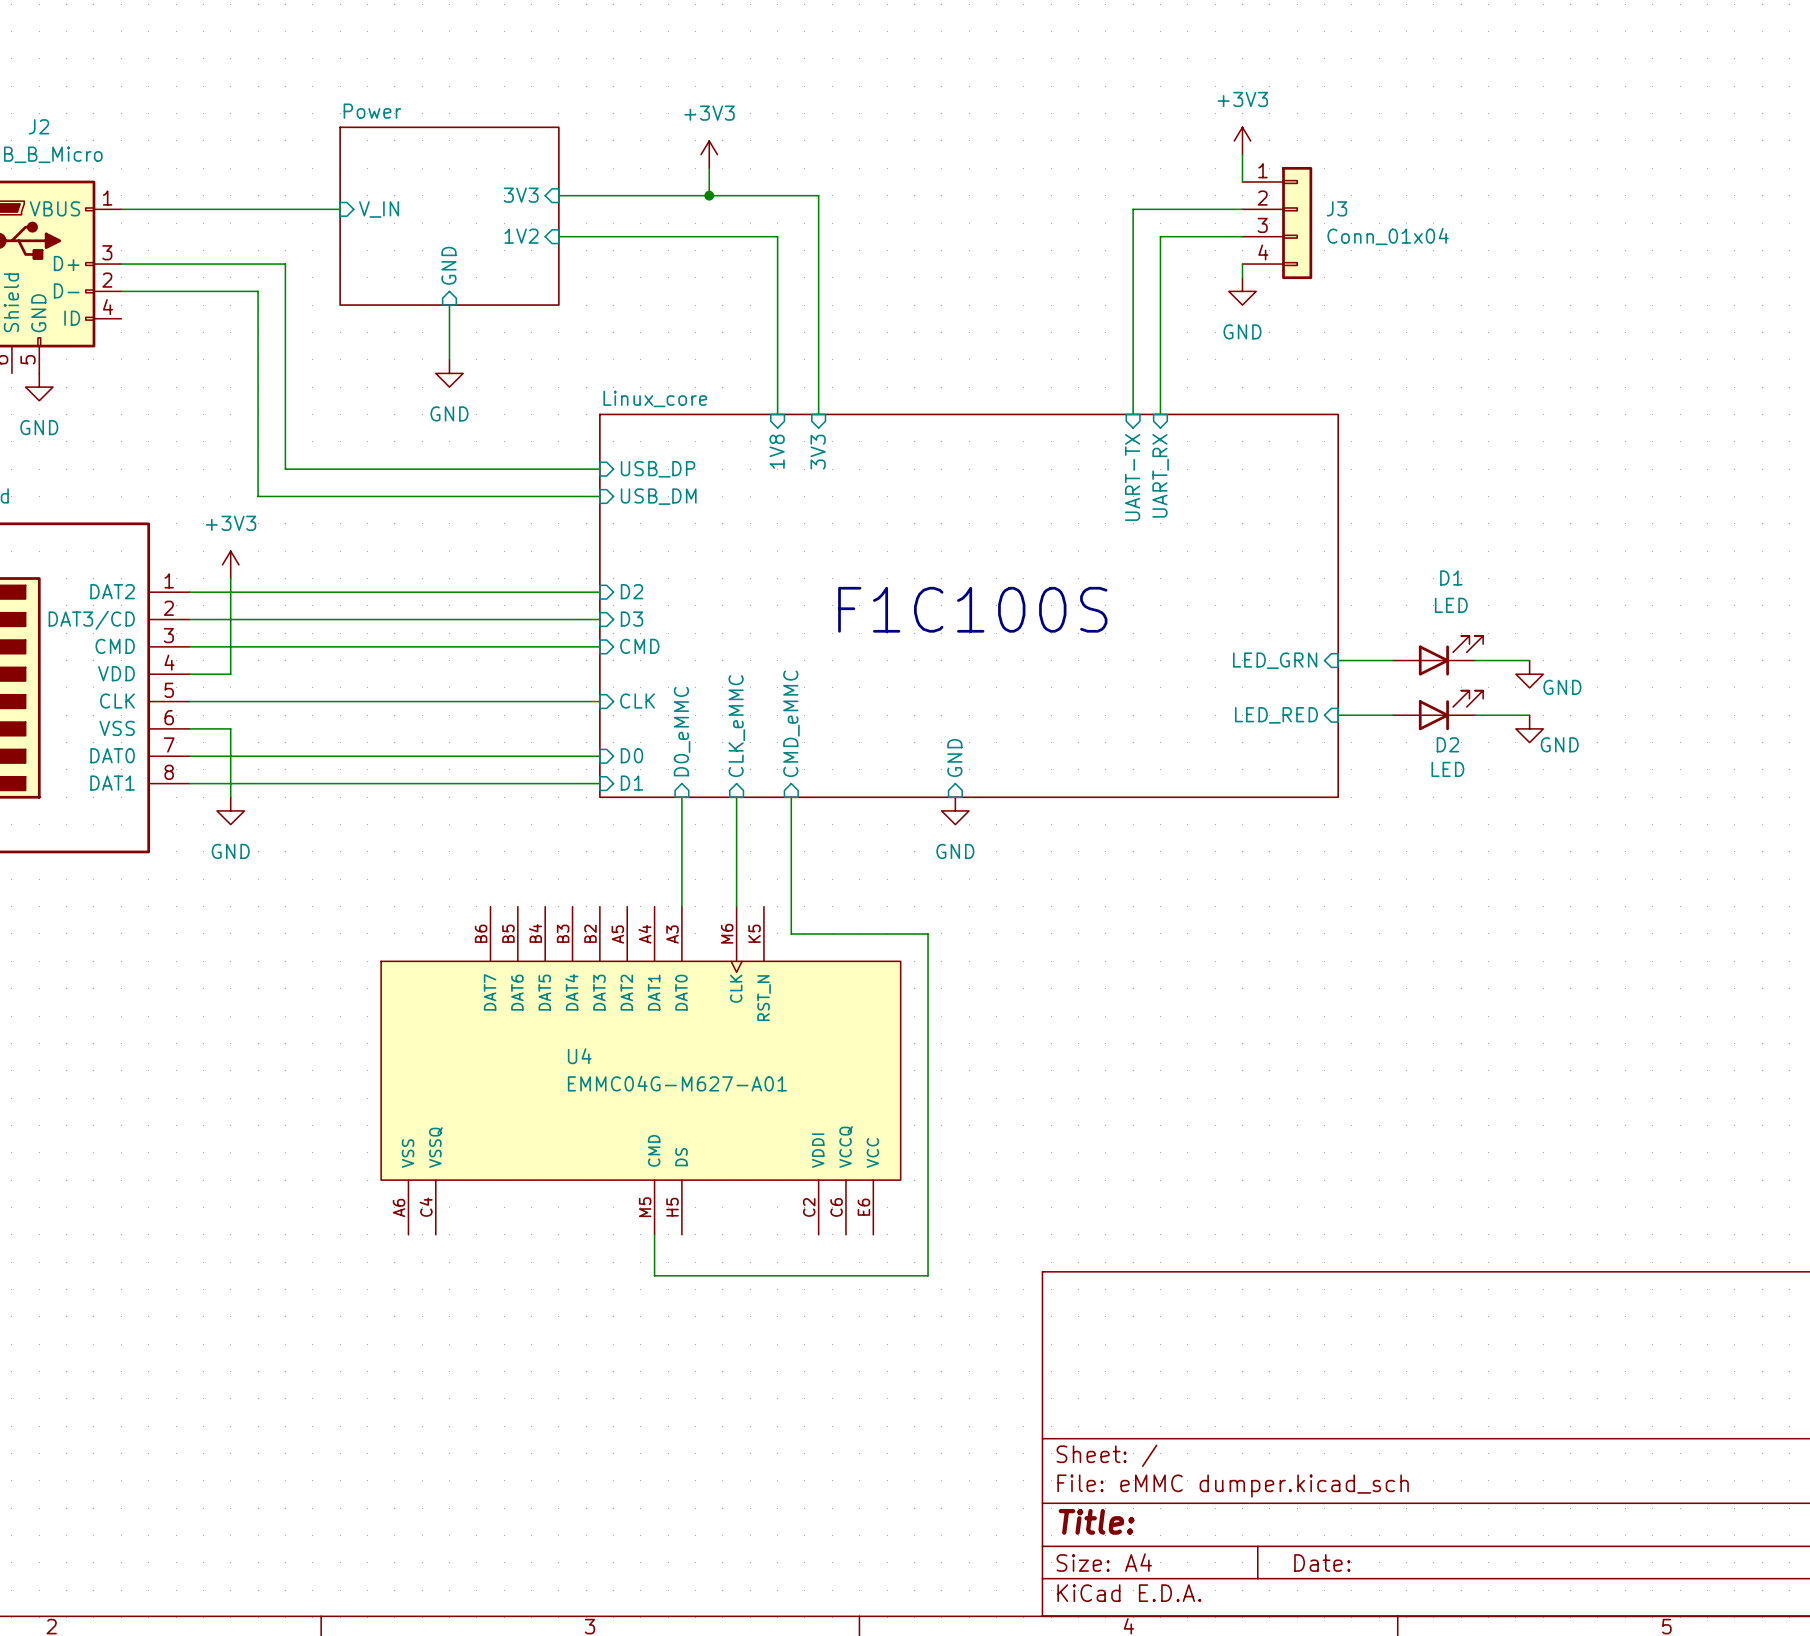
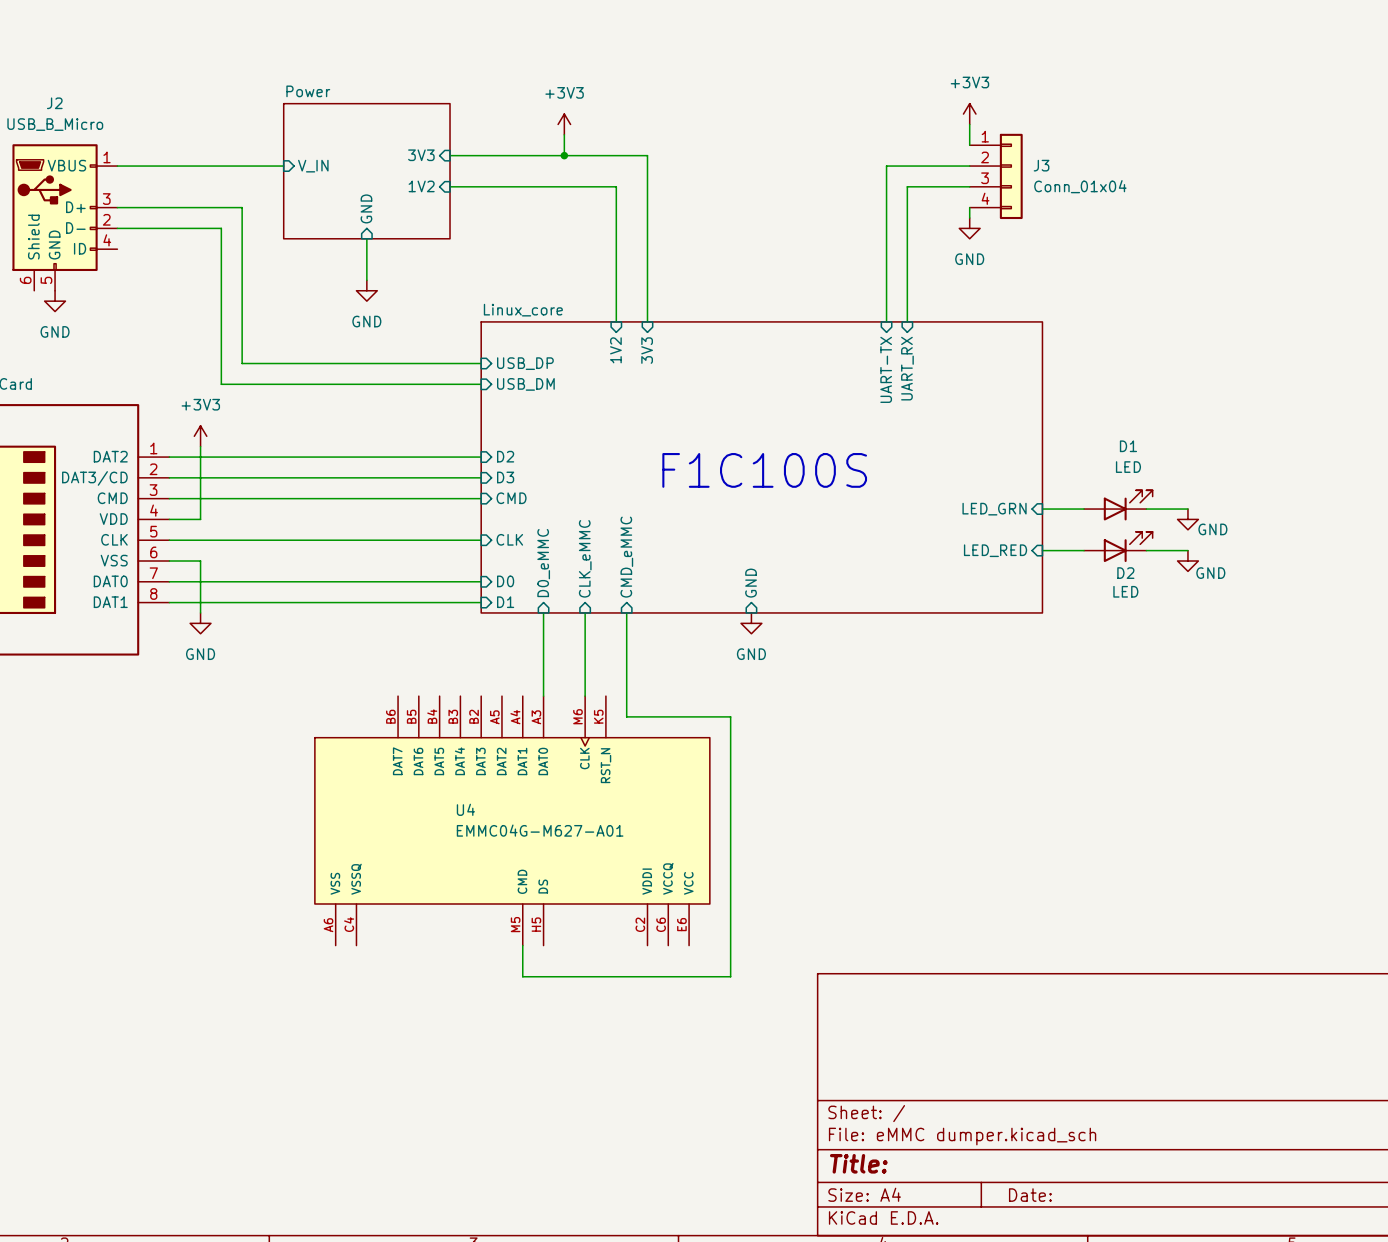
sheet pin: 1V8 (777, 451) -> 1V2 (615, 350)

